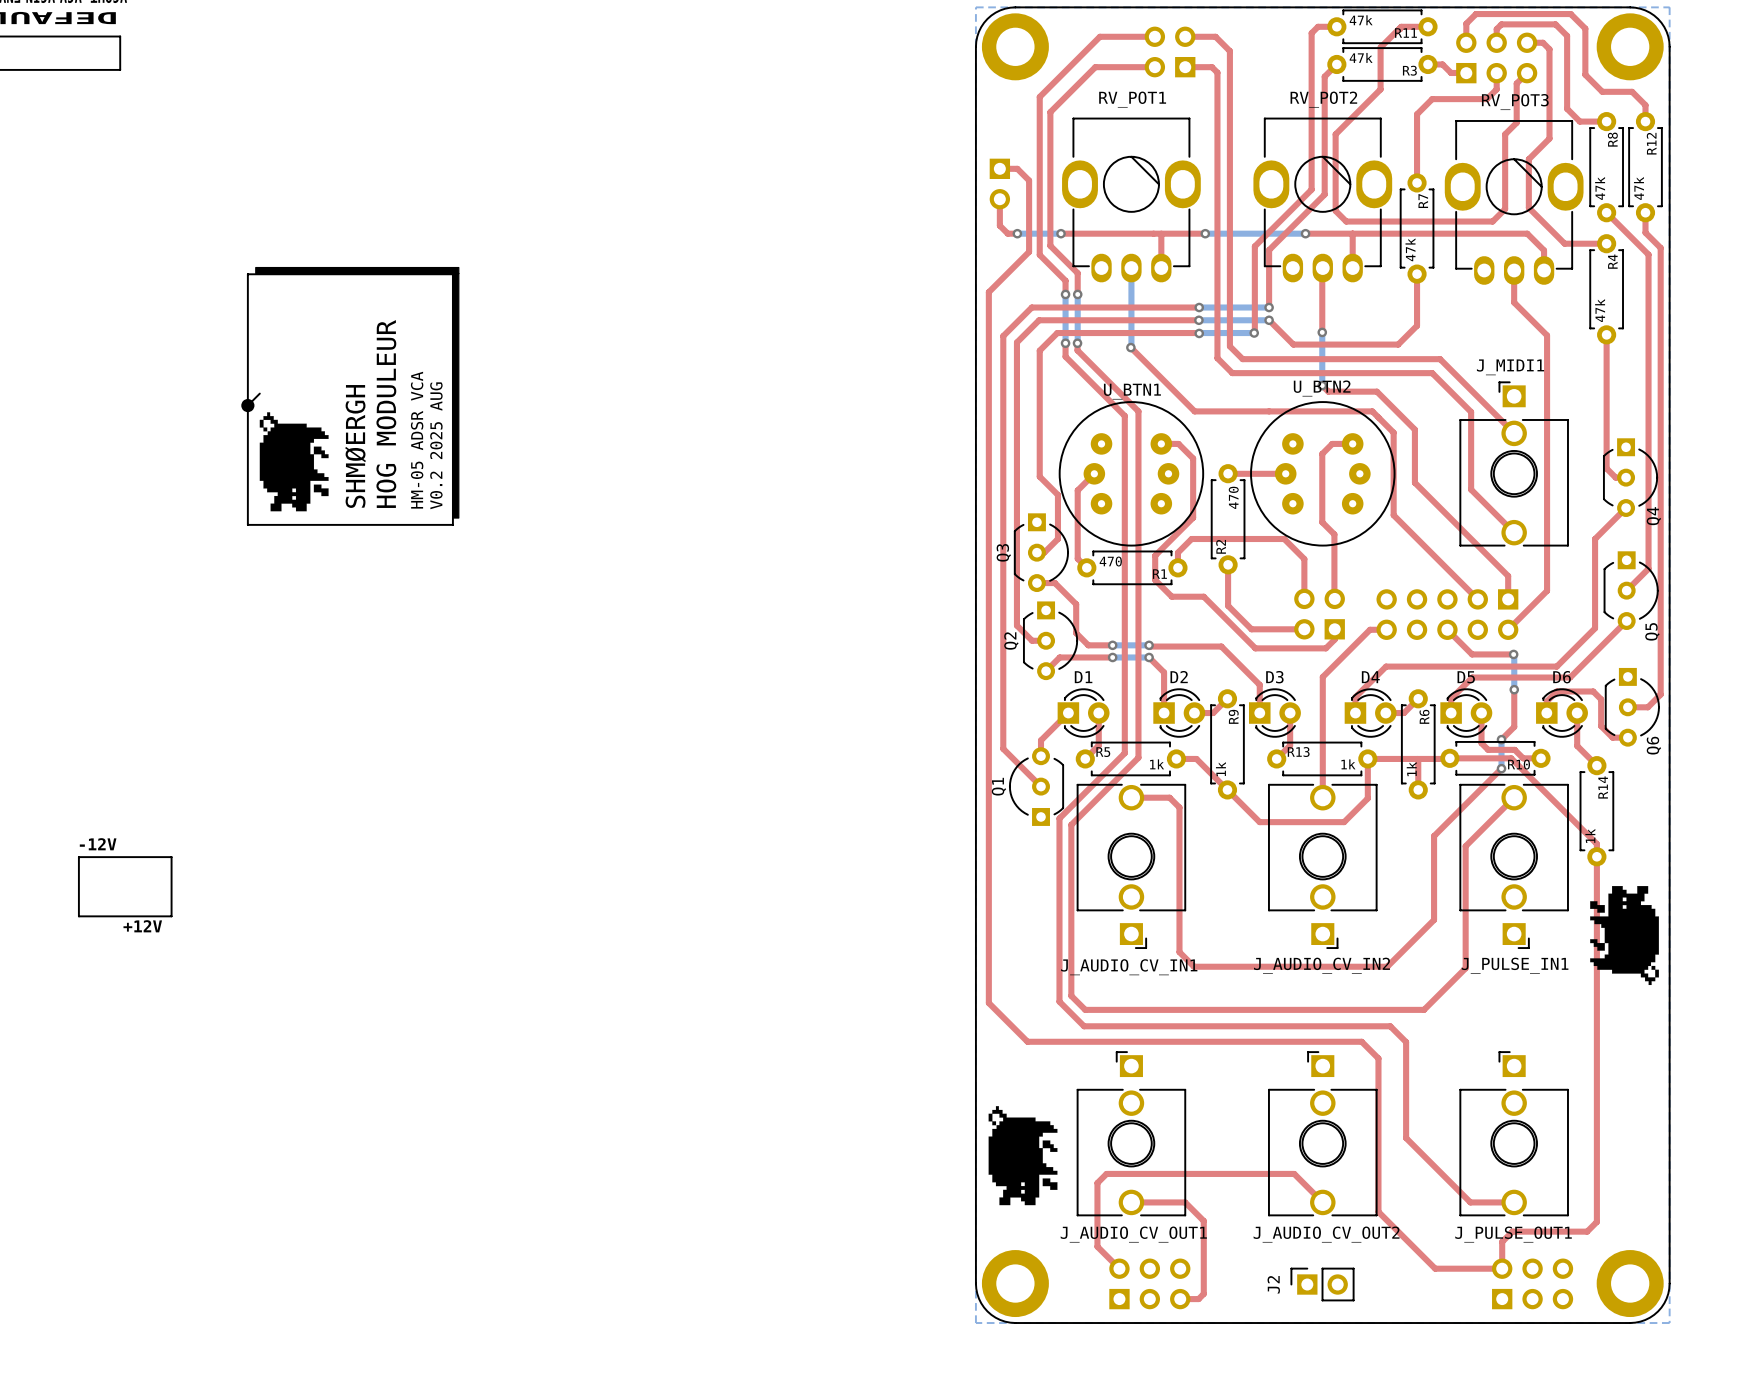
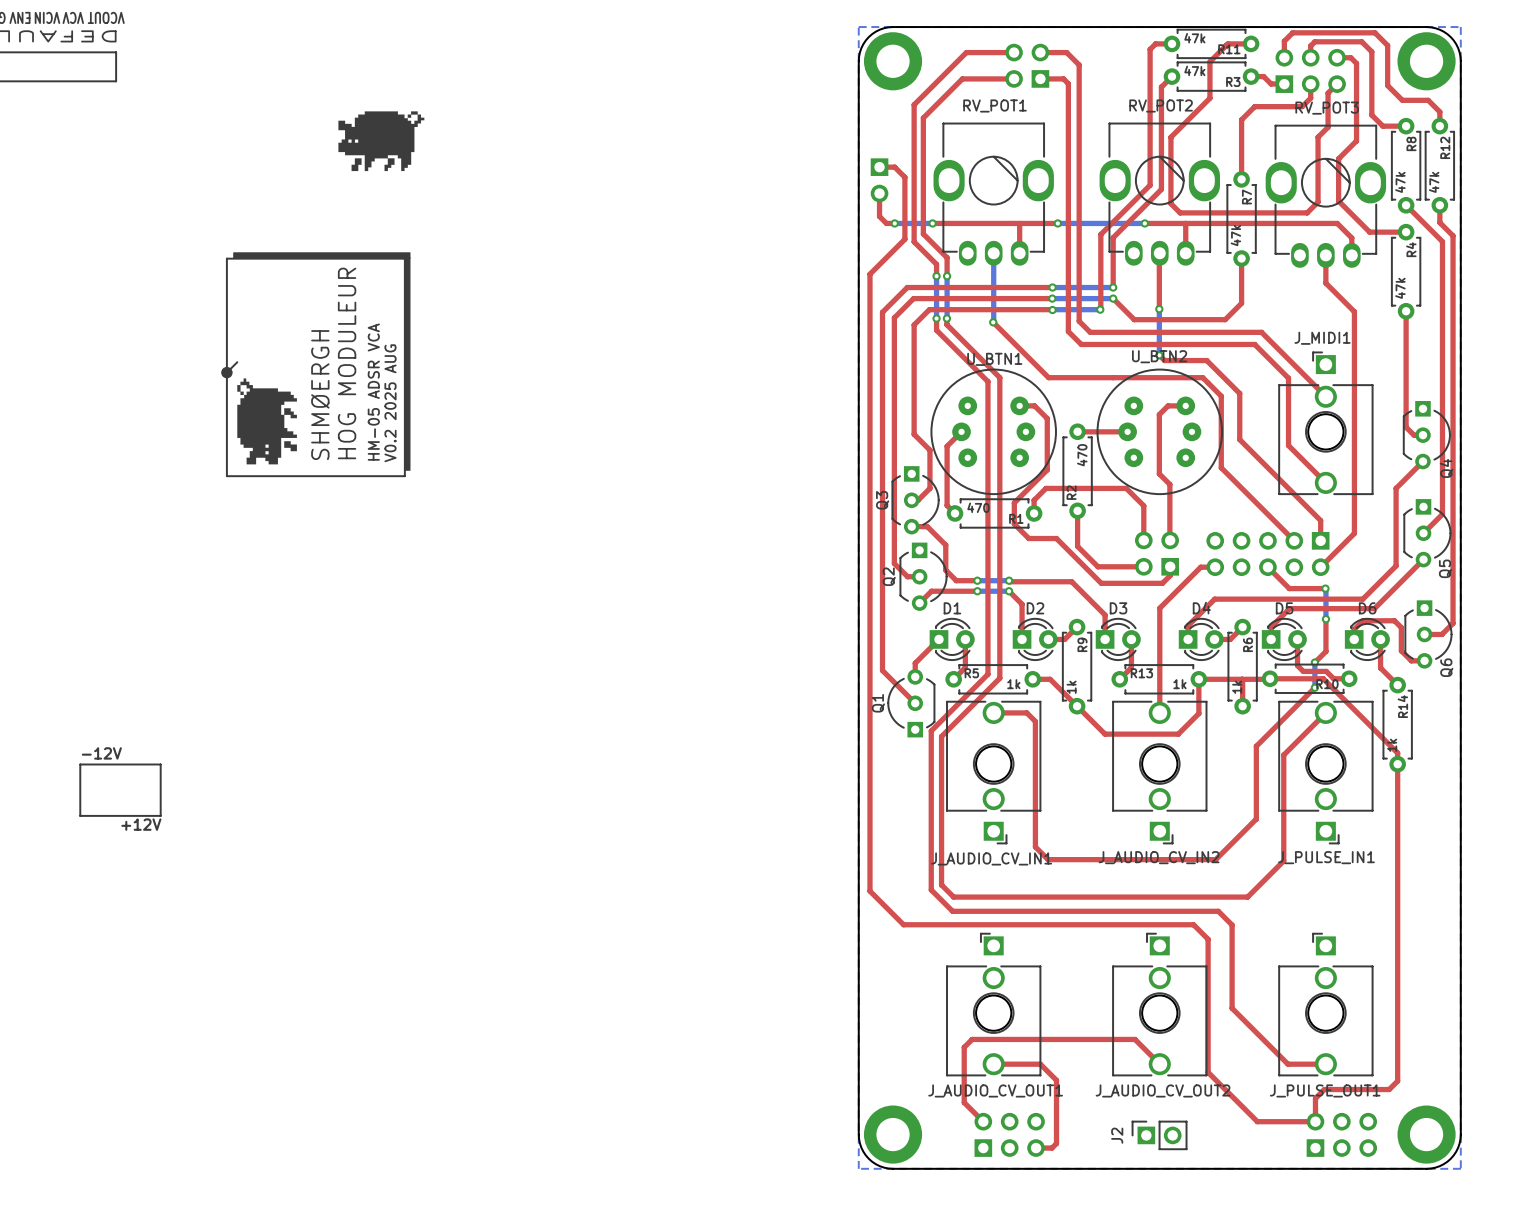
drawing: none -> [338, 111, 425, 172]
drawing: [1590, 886, 1659, 986] -> none
drawing: [988, 1106, 1058, 1206] -> none

